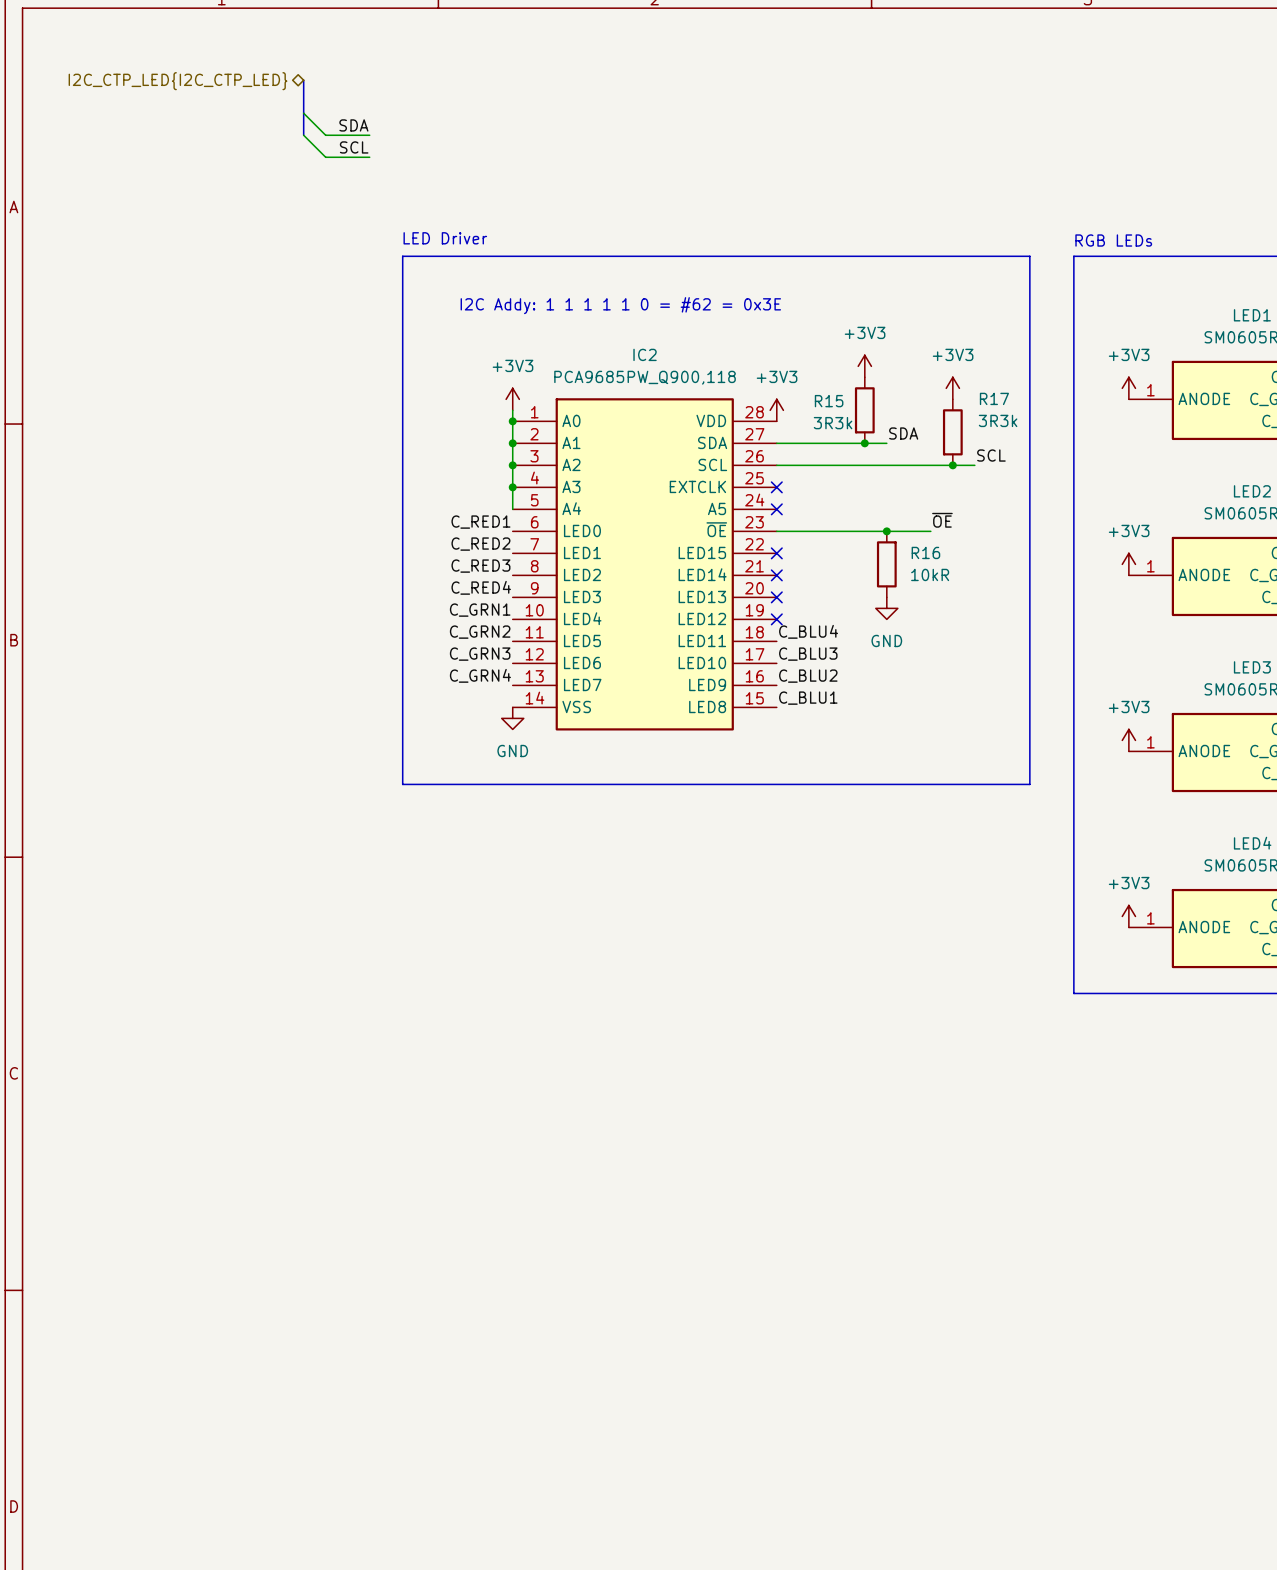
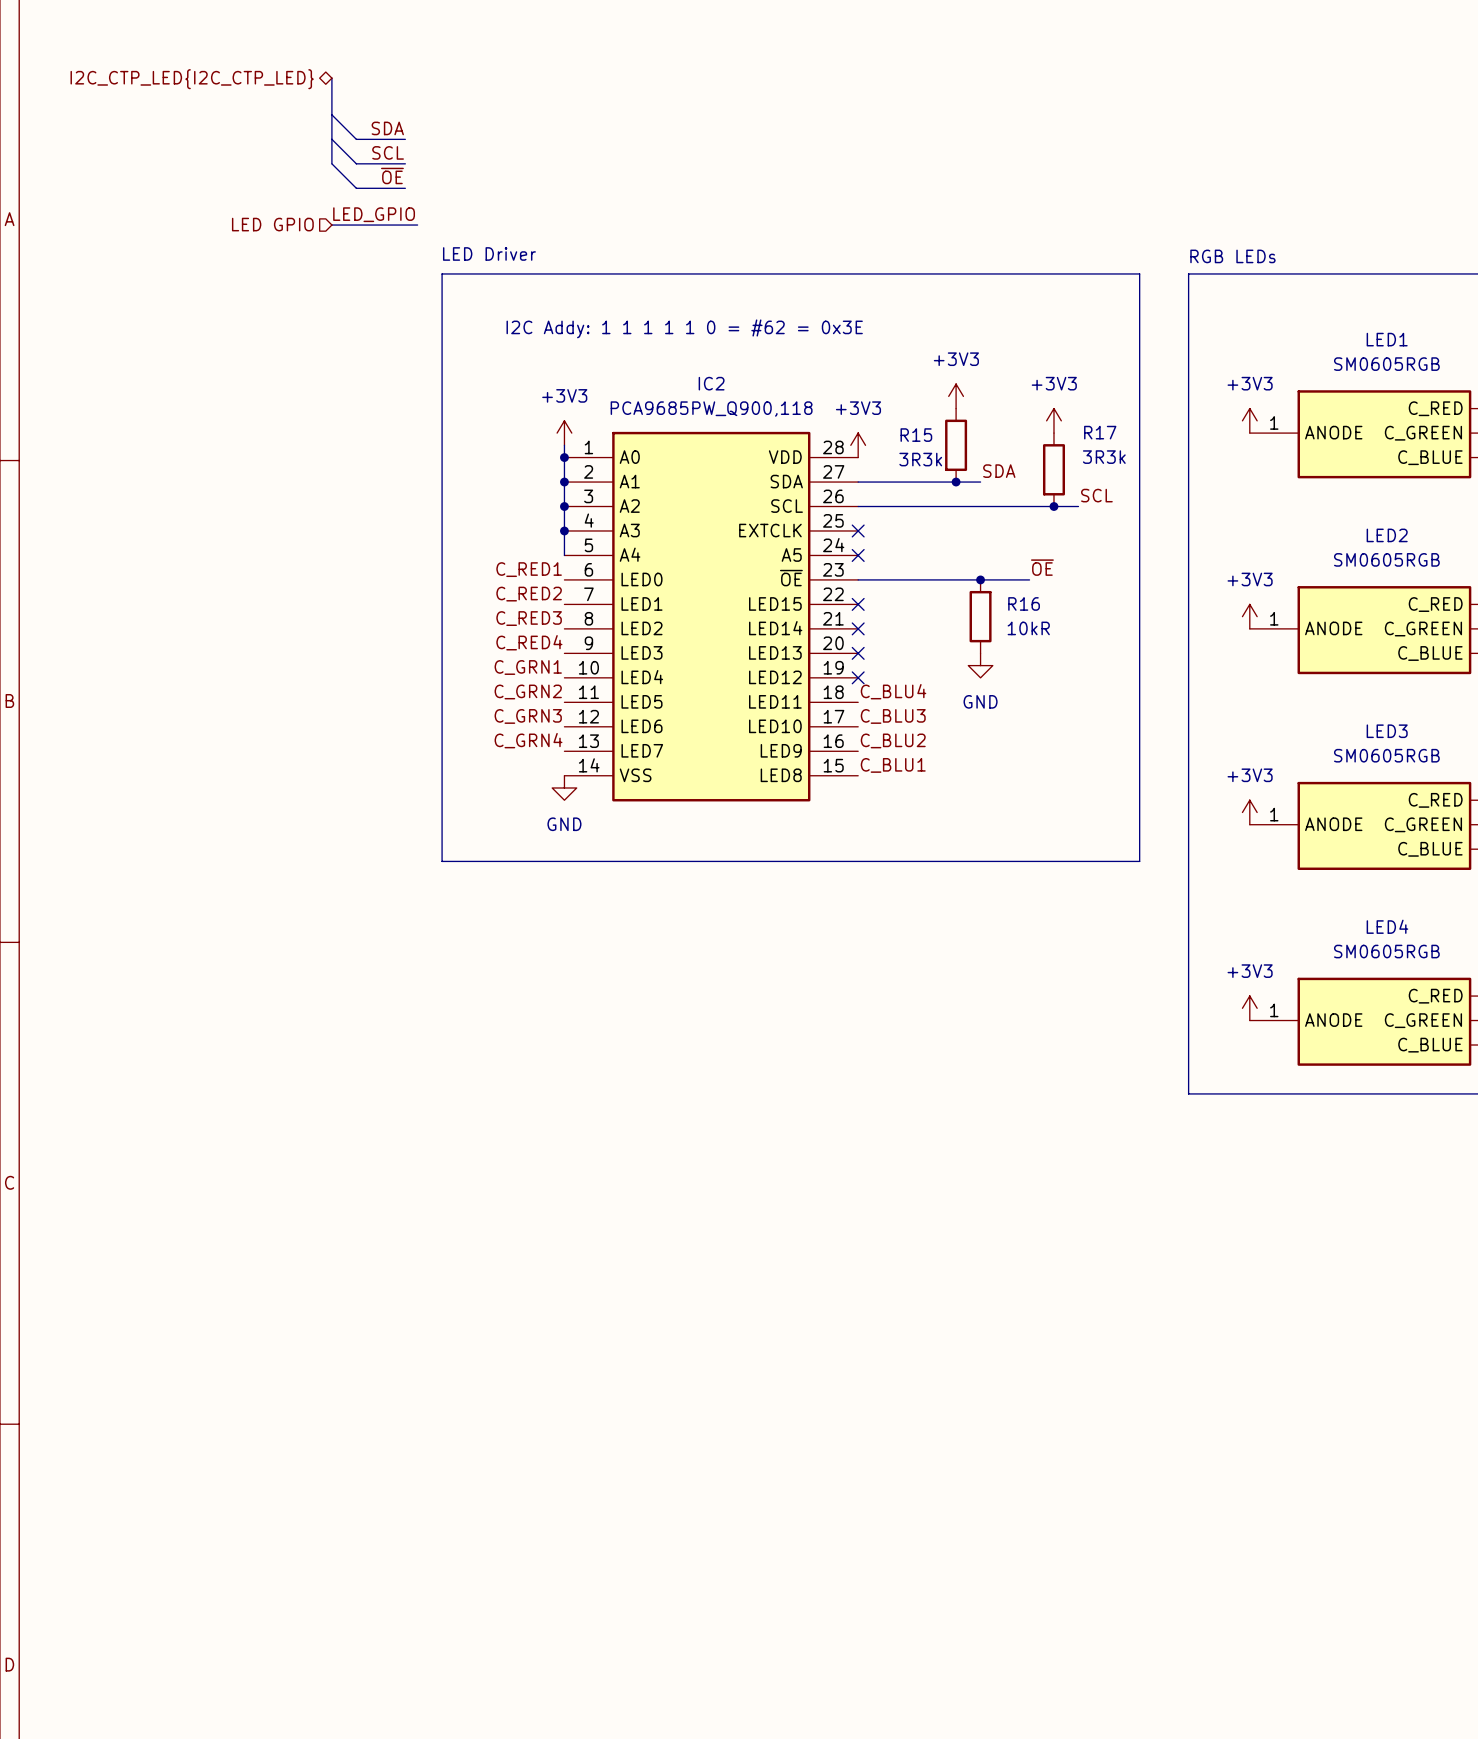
bus: none -> (331, 139) (331, 163)
wire: none -> (331, 163) (356, 188) (405, 188)
label: none -> ~{OE} (392, 175)
label: none -> LED_GPIO (374, 214)
hierarchical label: none -> LED GPIO (272, 224)
wire: none -> (331, 225) (417, 225)

